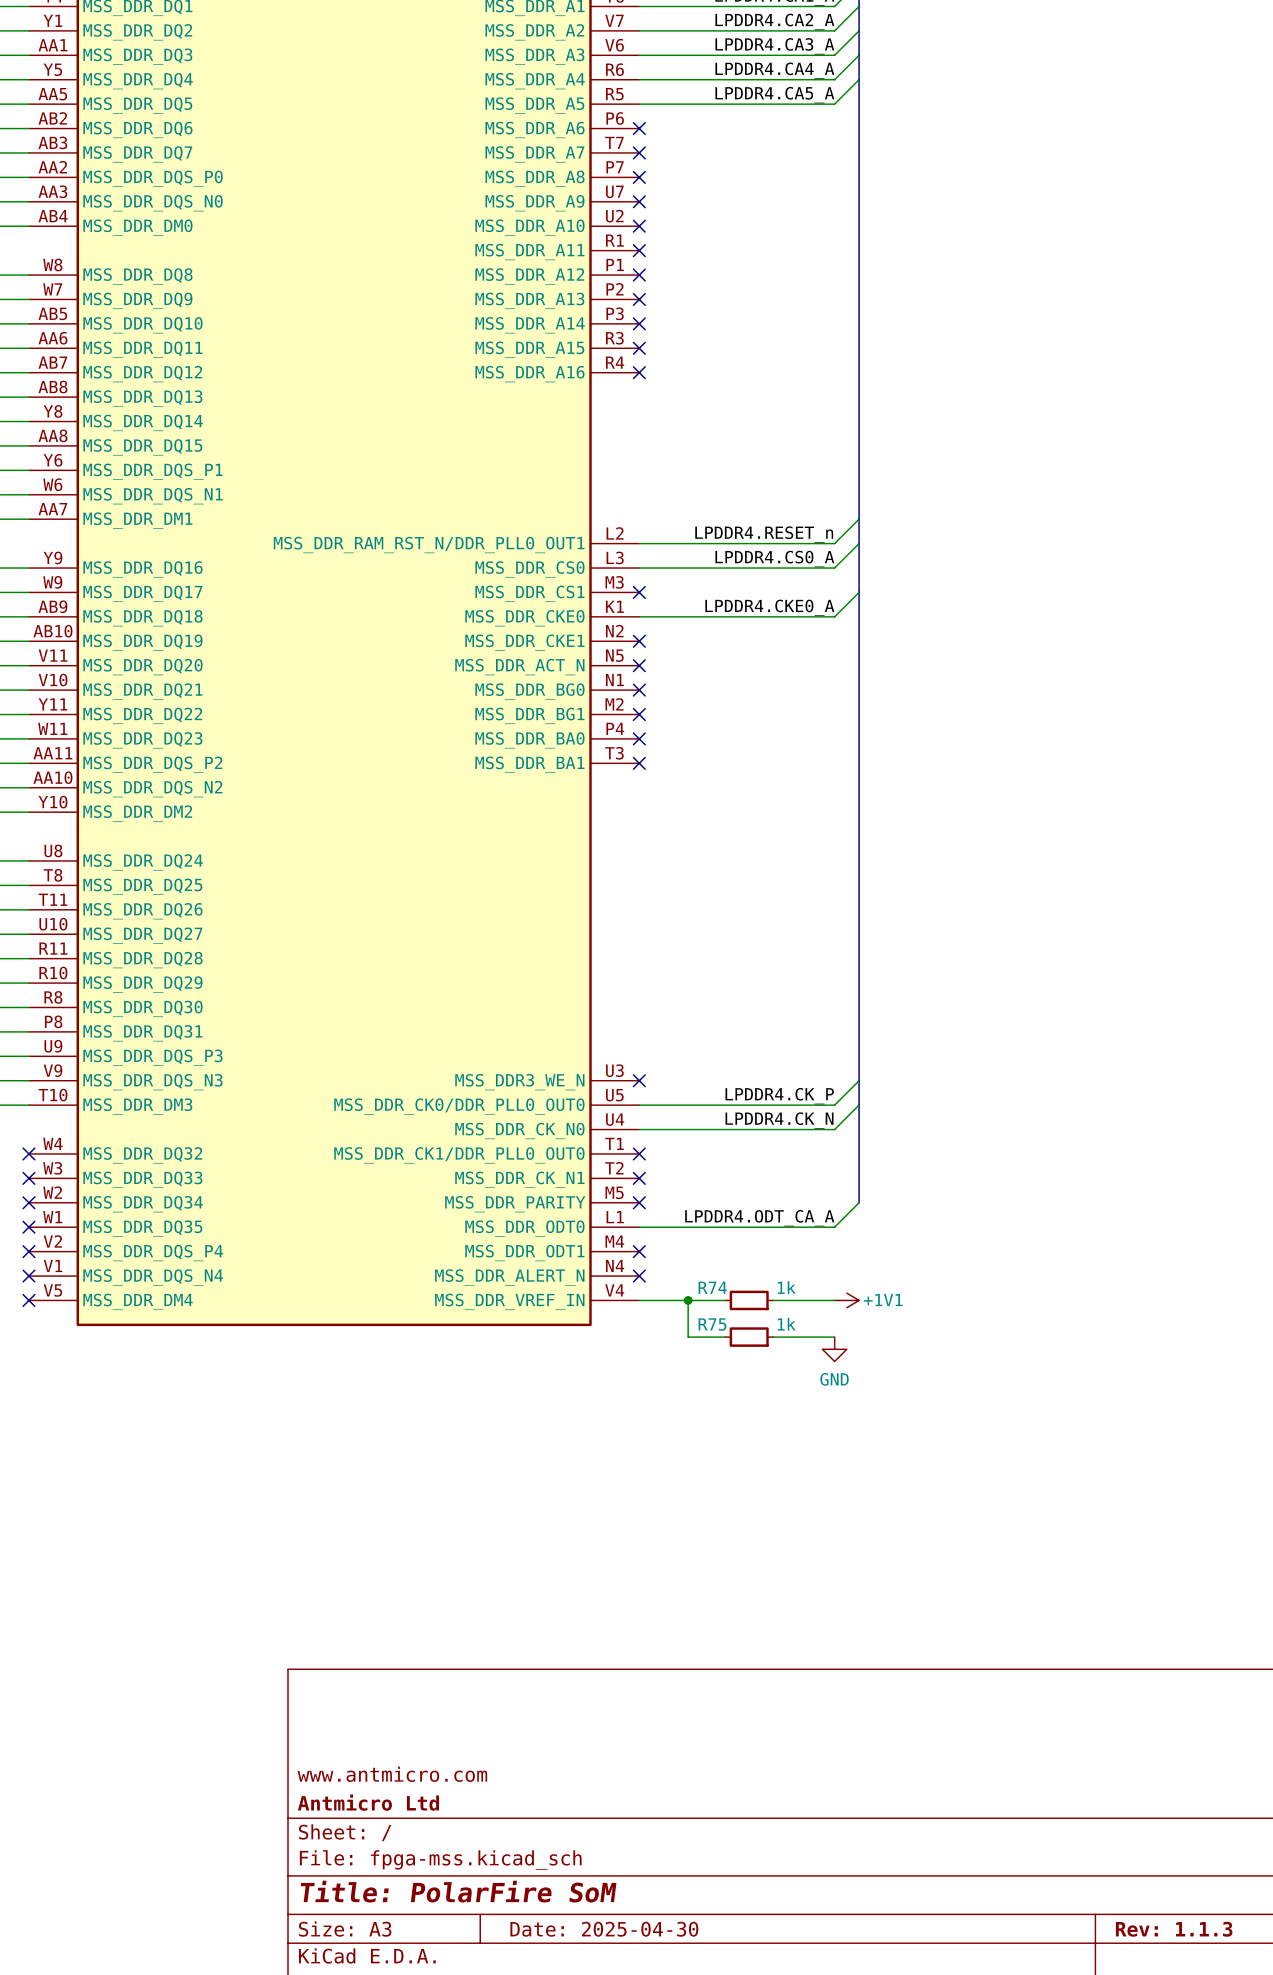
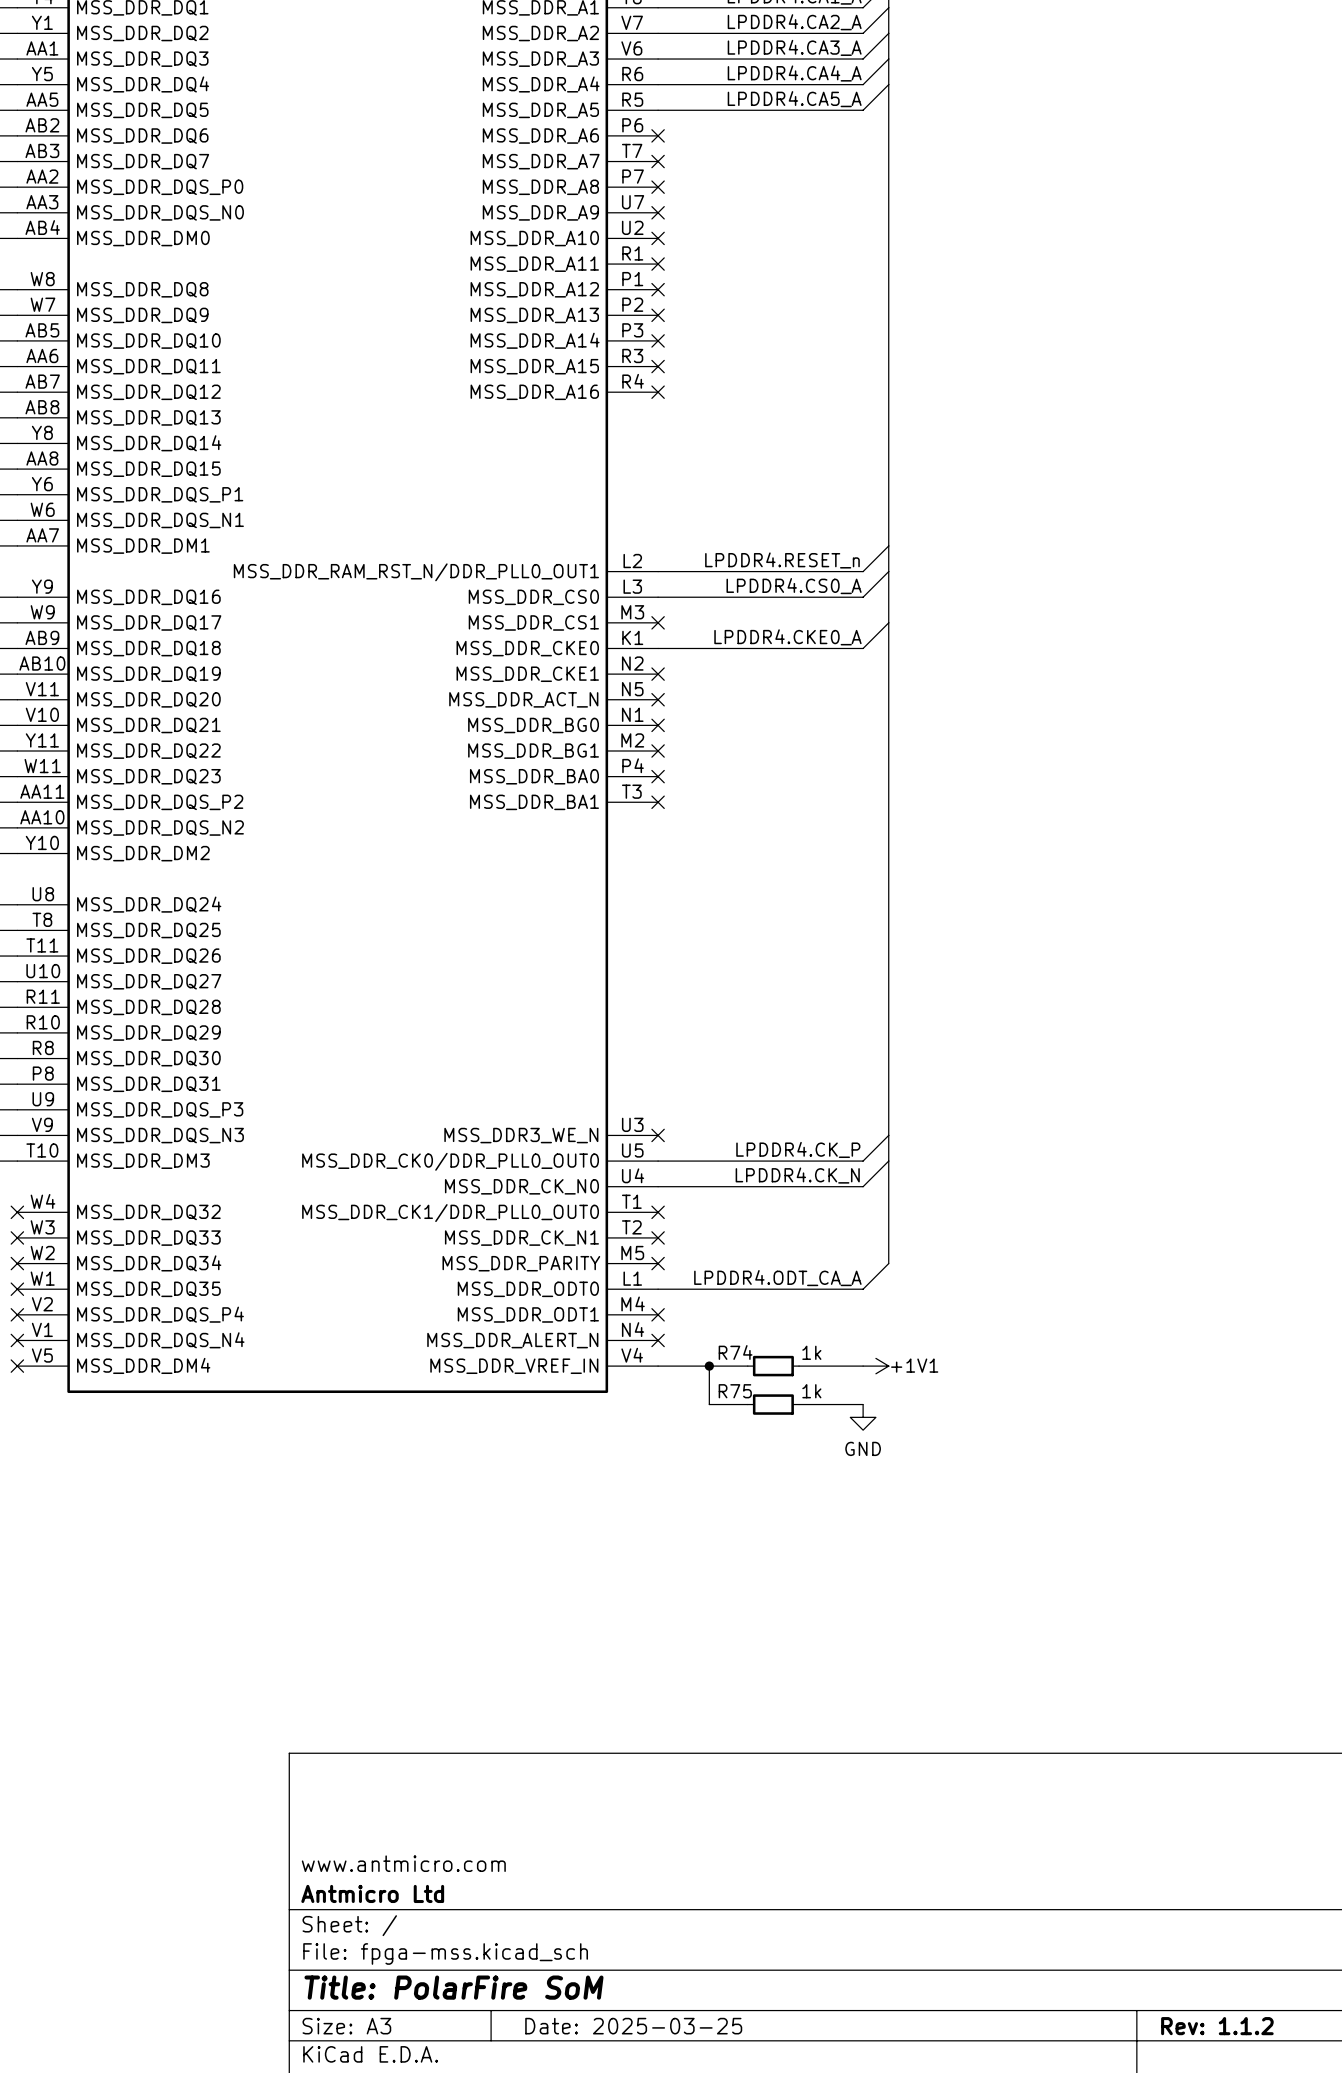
title block: Date: 2025-04-30 (604, 1929) -> Date: 2025-03-25 (633, 2026)
title block: Rev: 1.1.3 (1174, 1929) -> Rev: 1.1.2 (1217, 2026)

